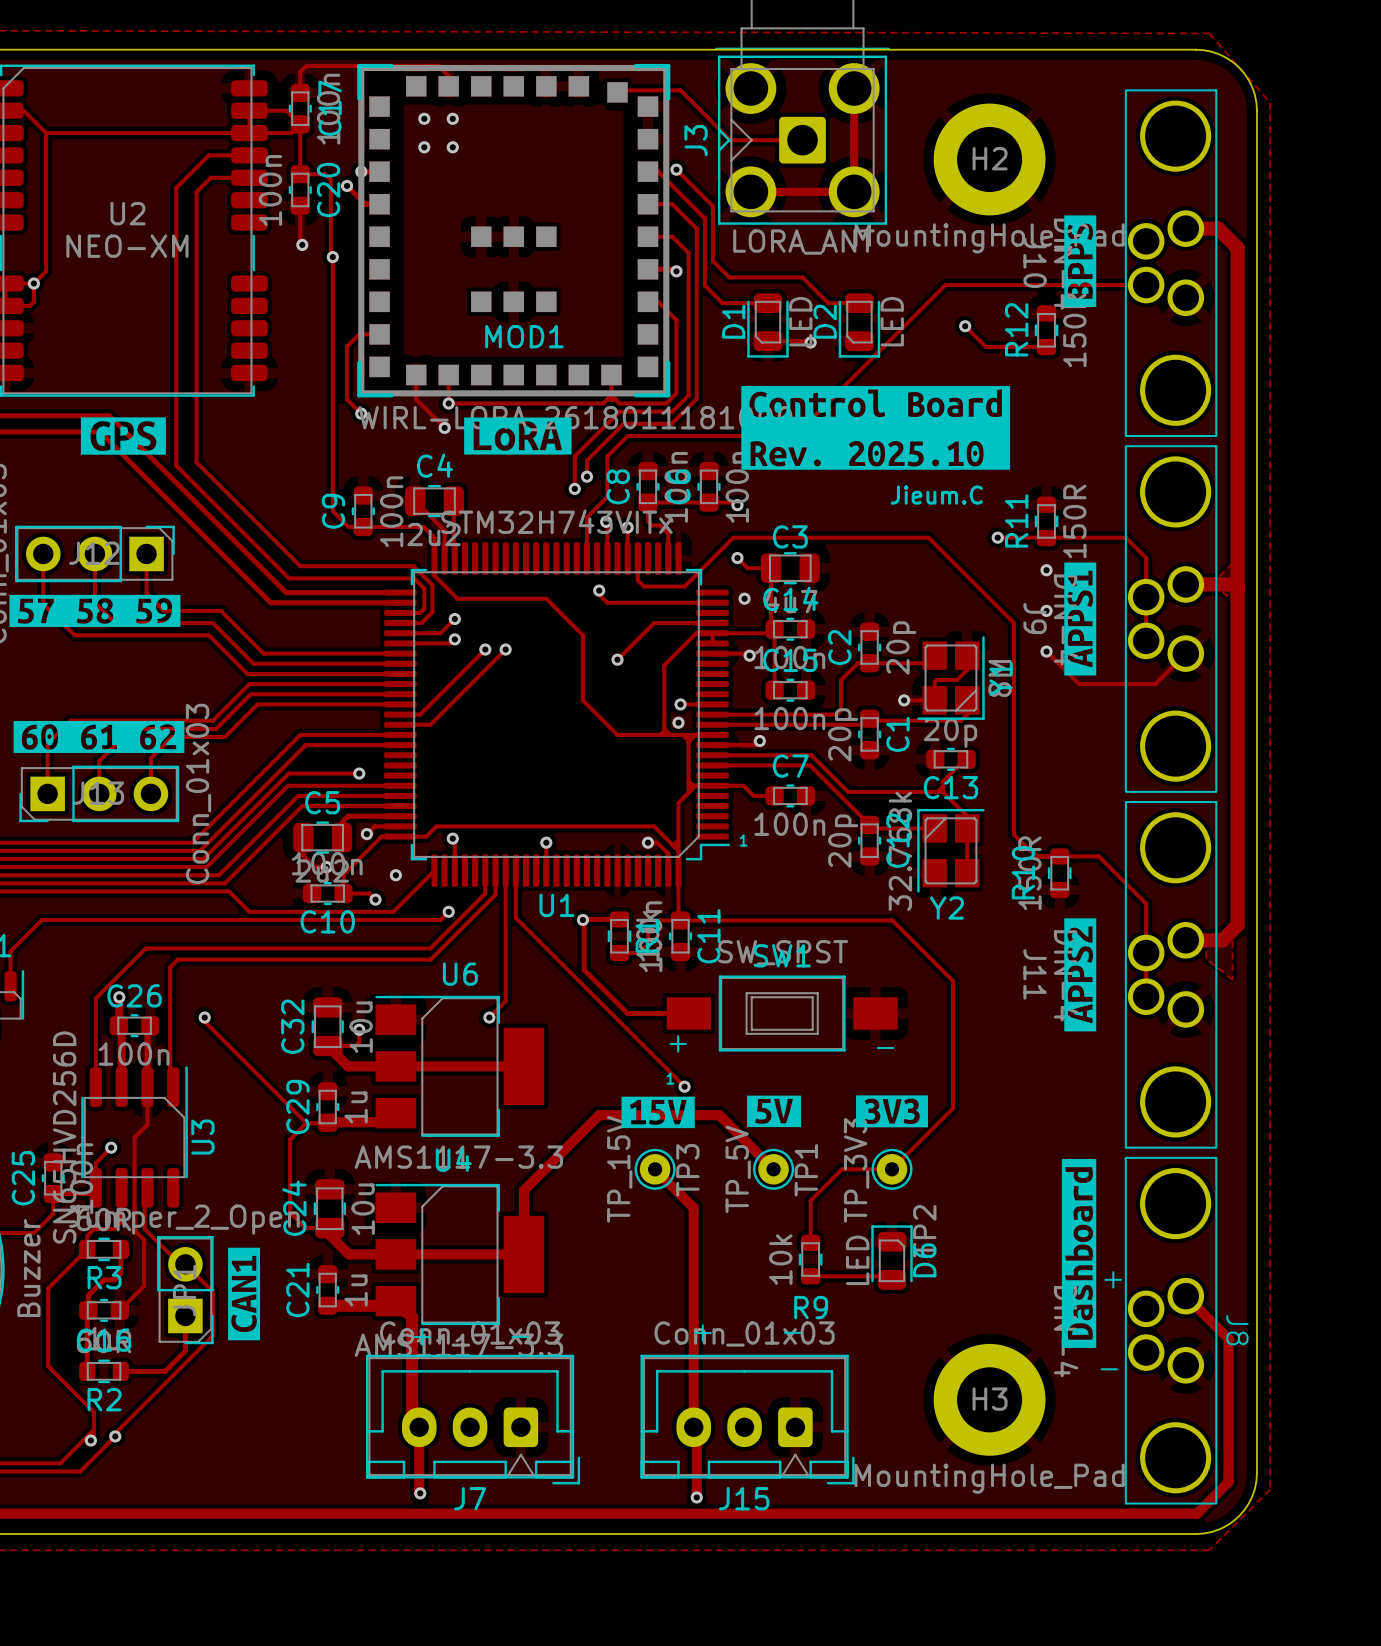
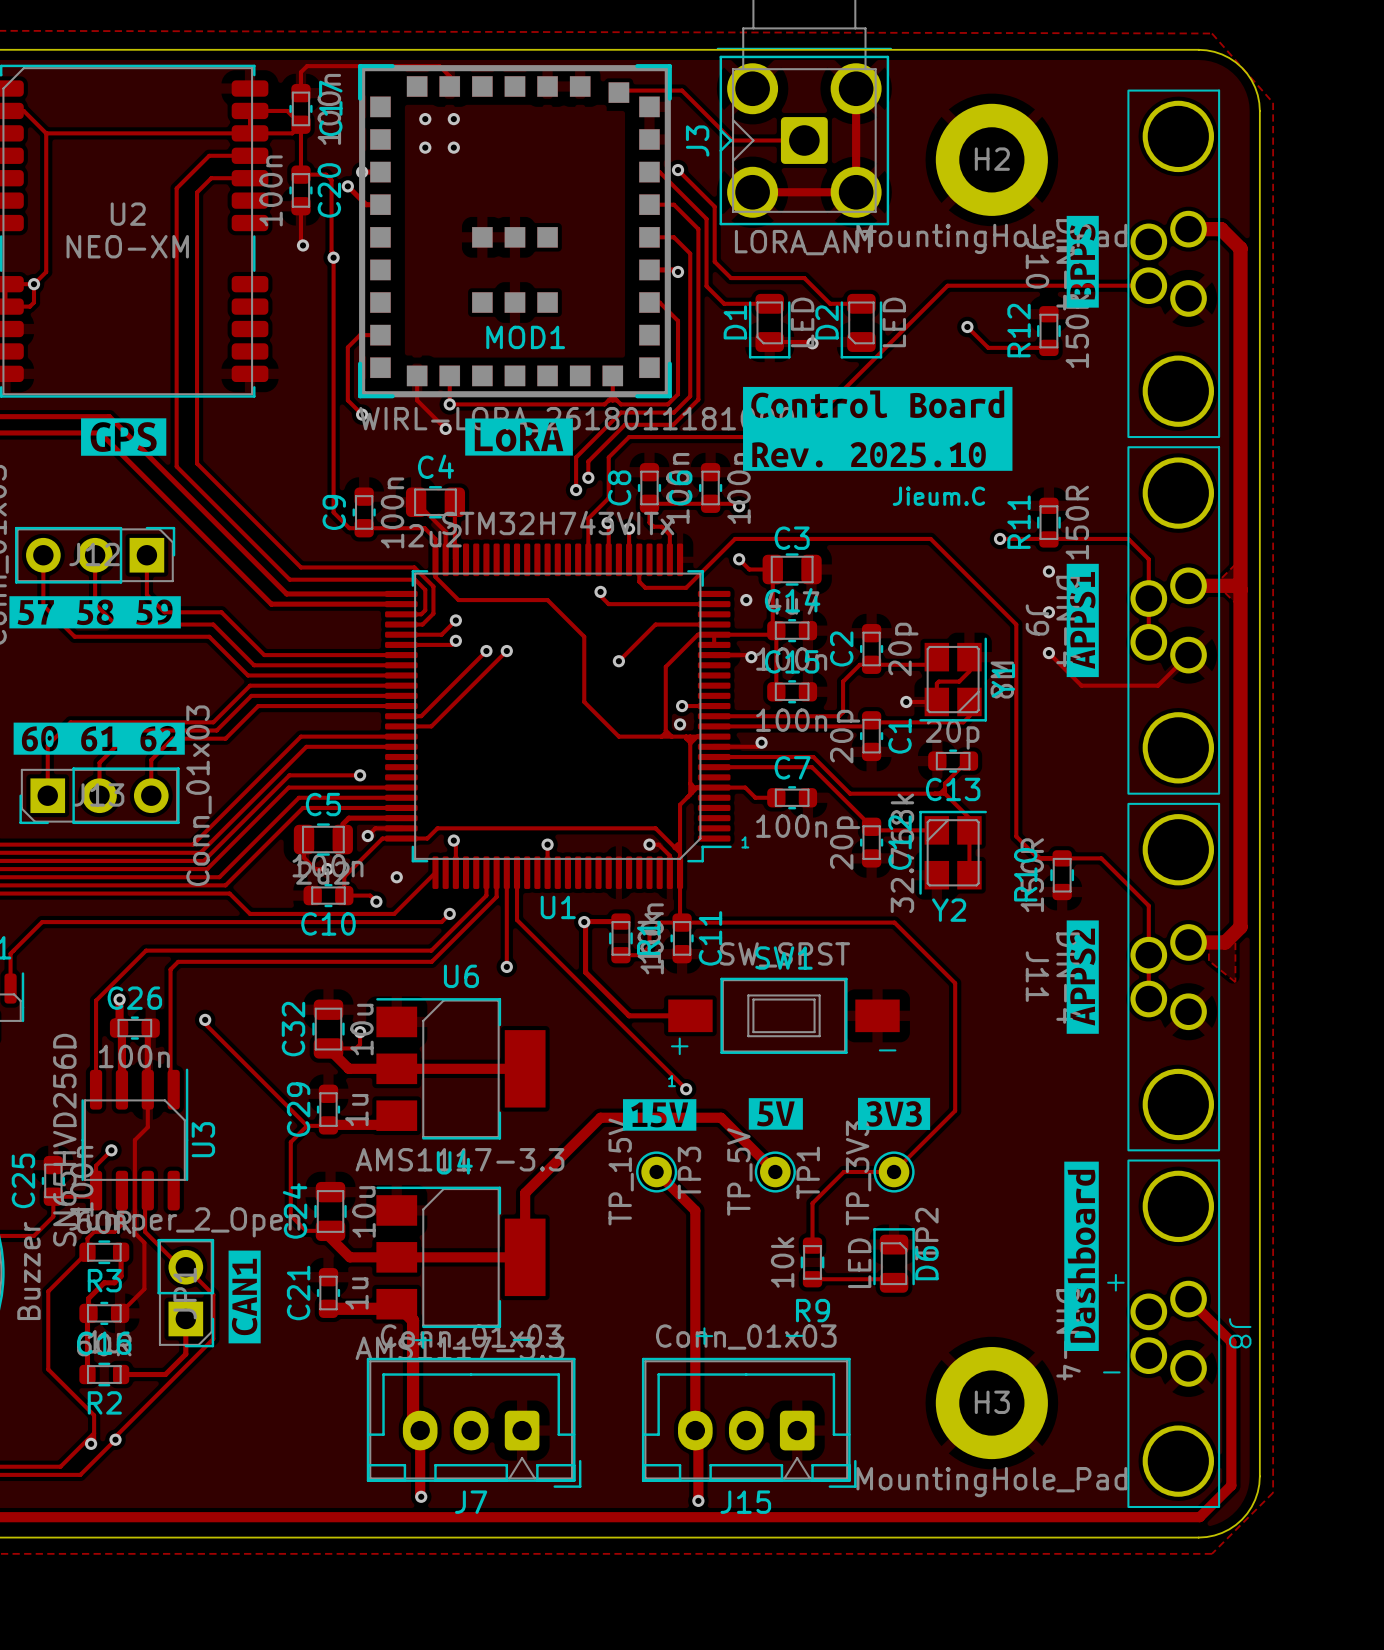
track: (505, 964) (505, 1001) (489, 1017) -> none
via position: (489, 1017) -> (506, 966)

